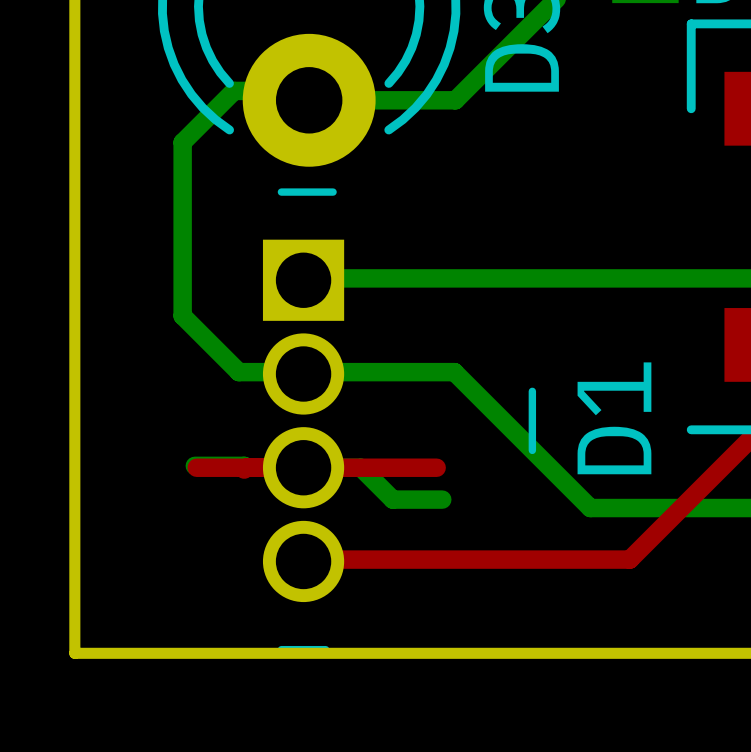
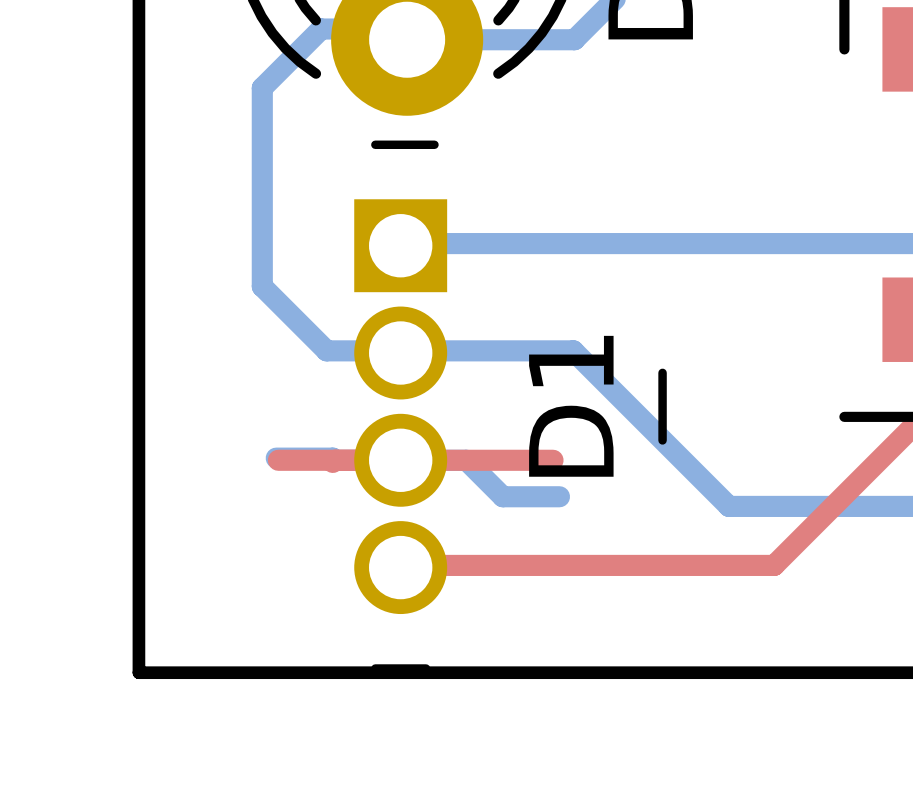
D1 name position: D1 (614, 418) -> D1 (571, 406)

